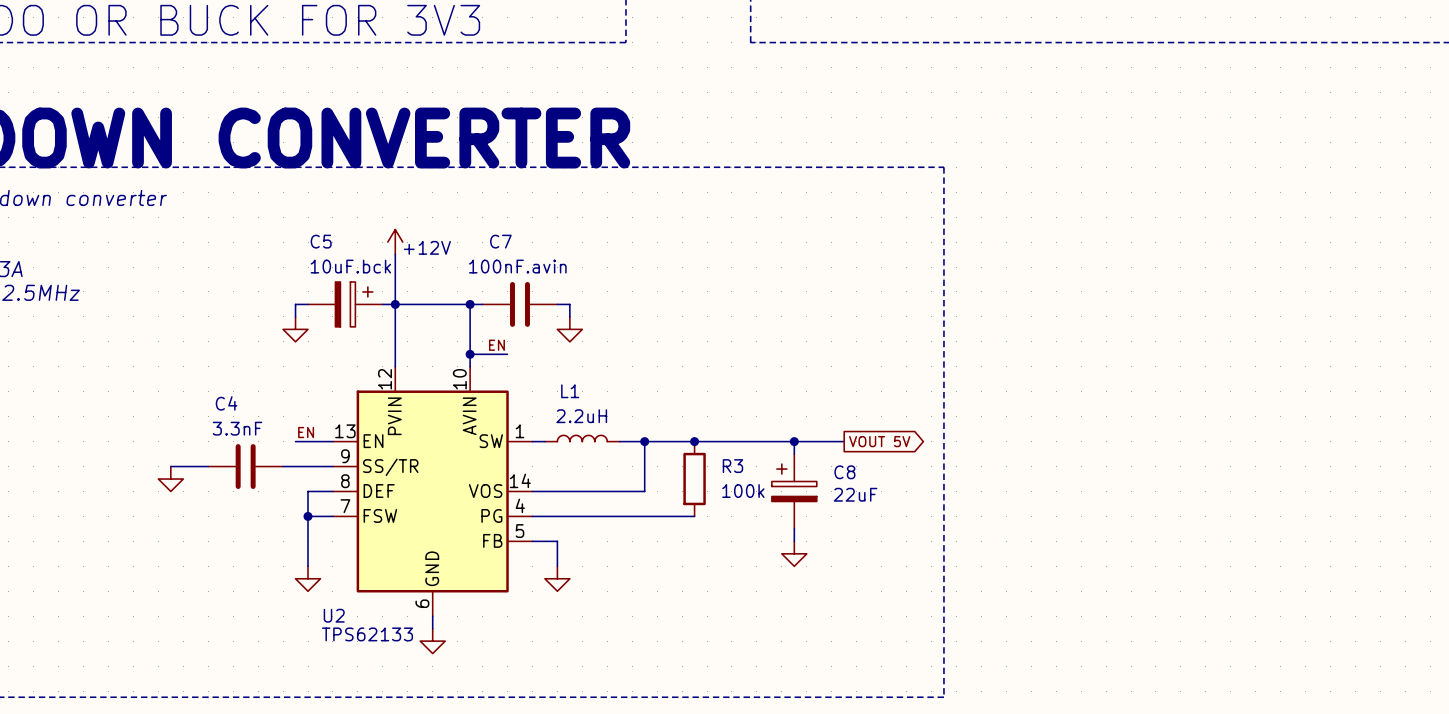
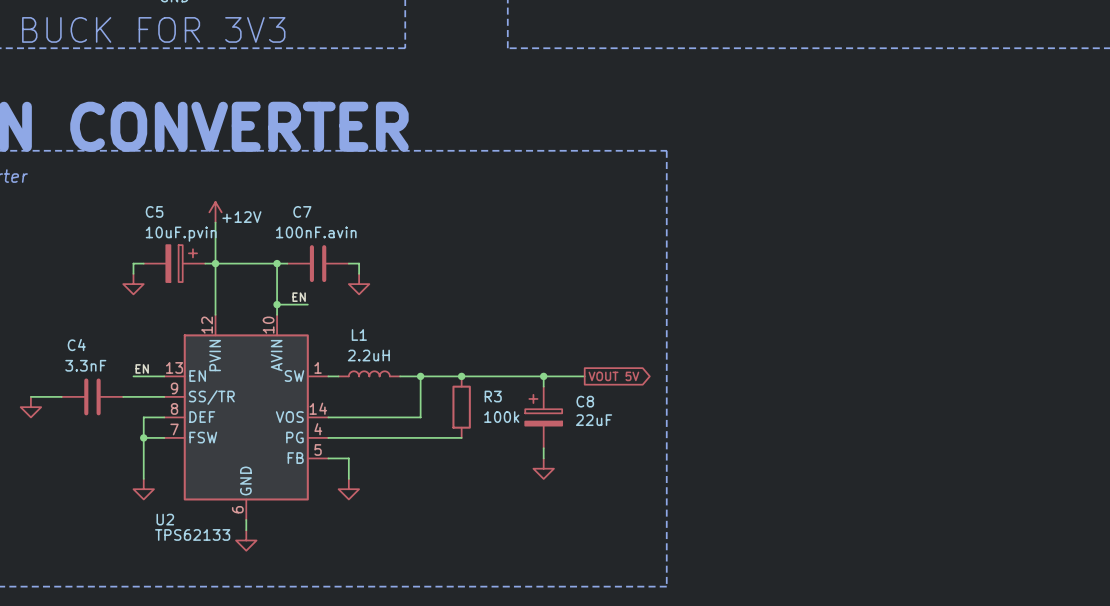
C5 value: 10uF.bck (350, 266) -> 10uF.pvin (181, 234)

